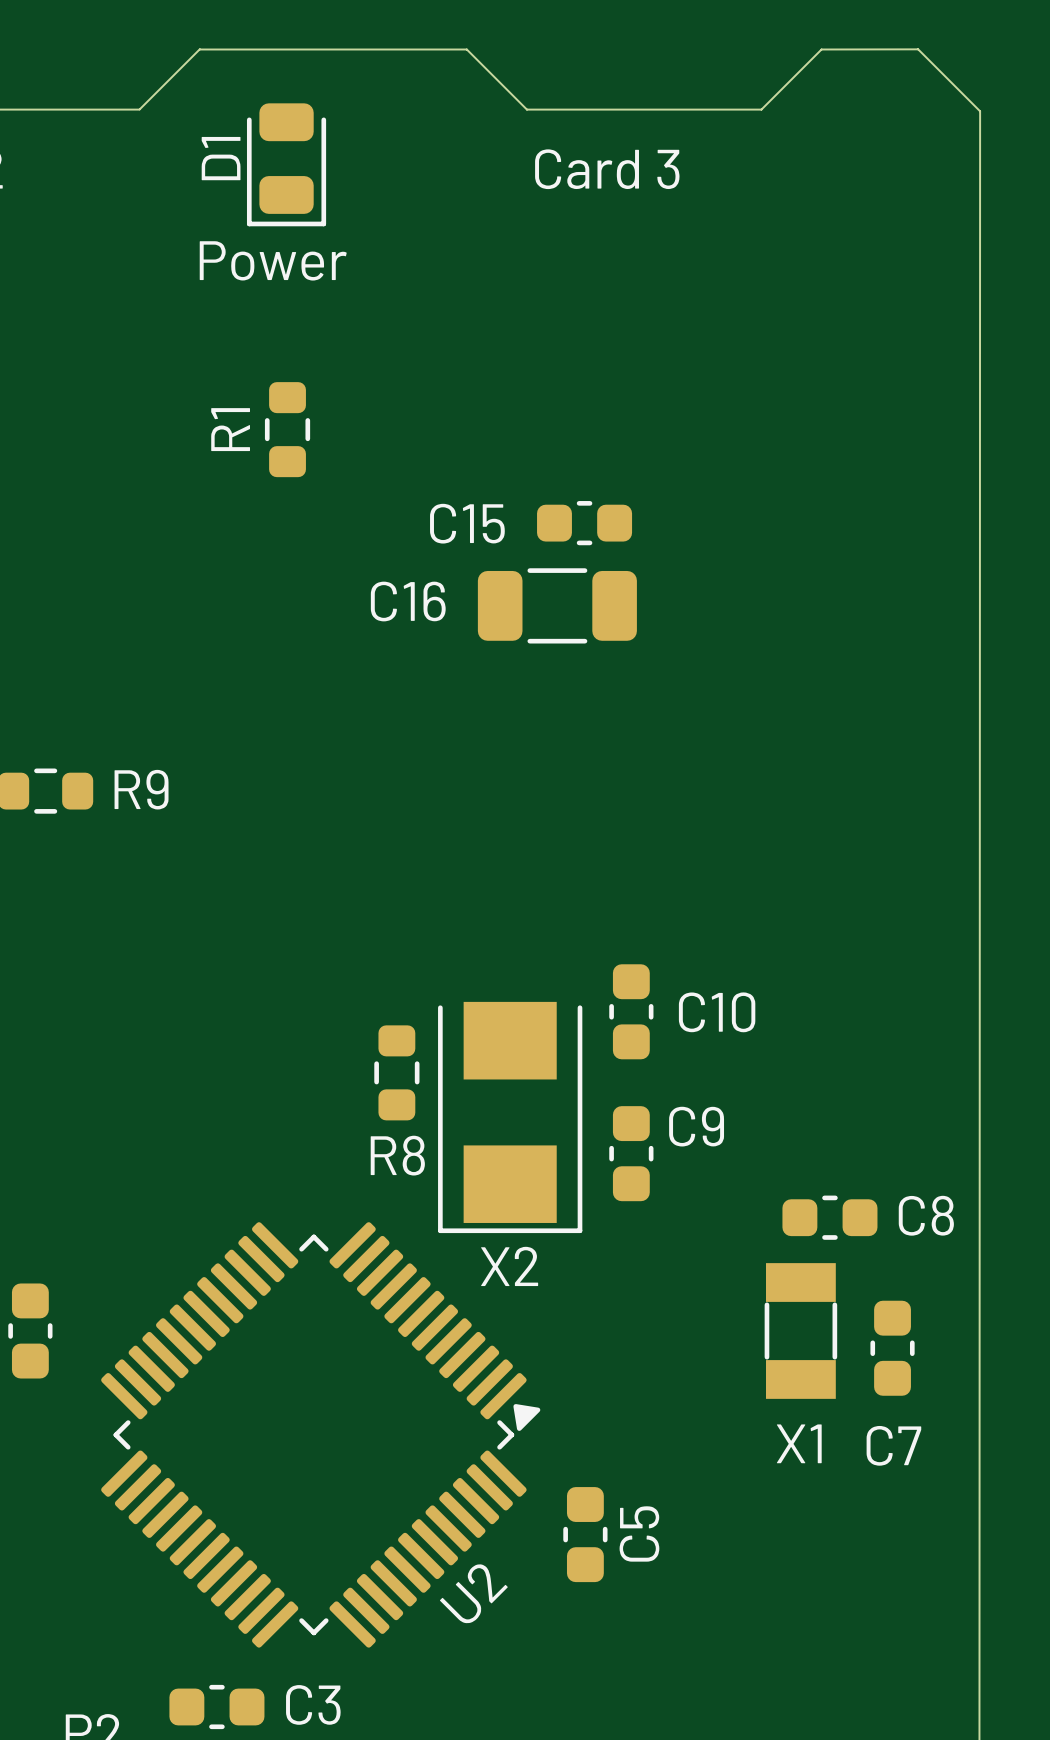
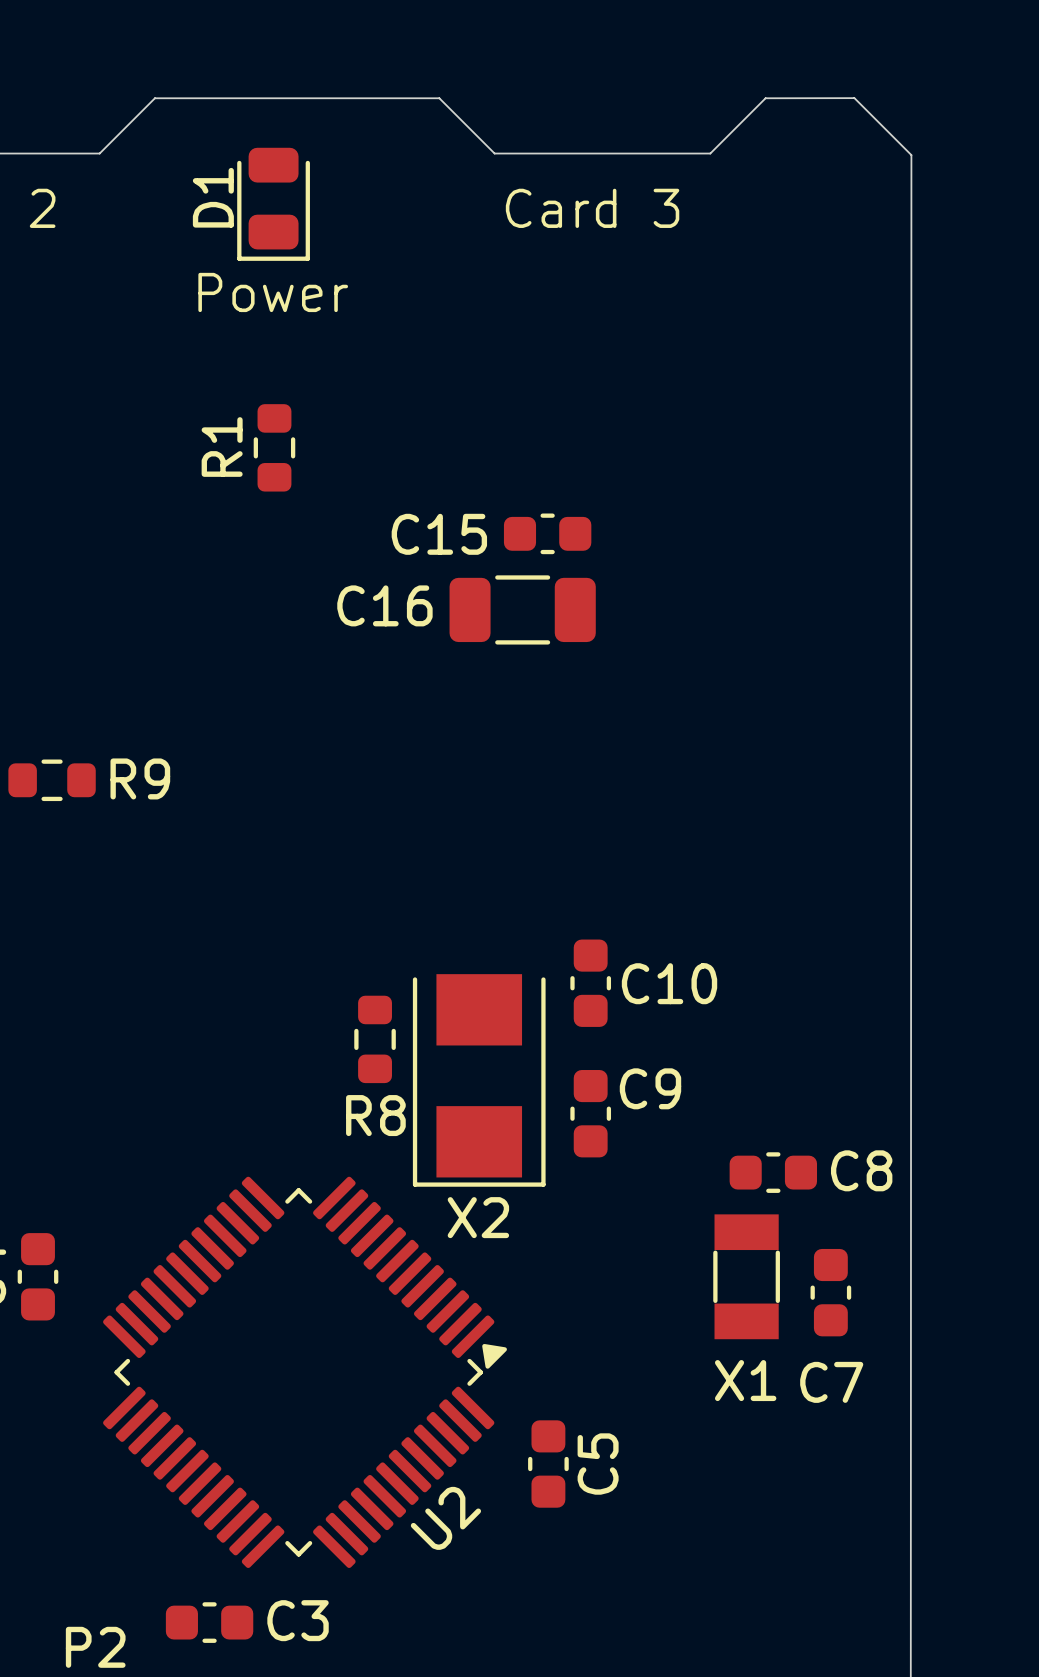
board edge: (199, 49) (139, 109) -> (193, 98) (154, 98) (99, 153)
board edge: (97, 109) (139, 109) -> none

